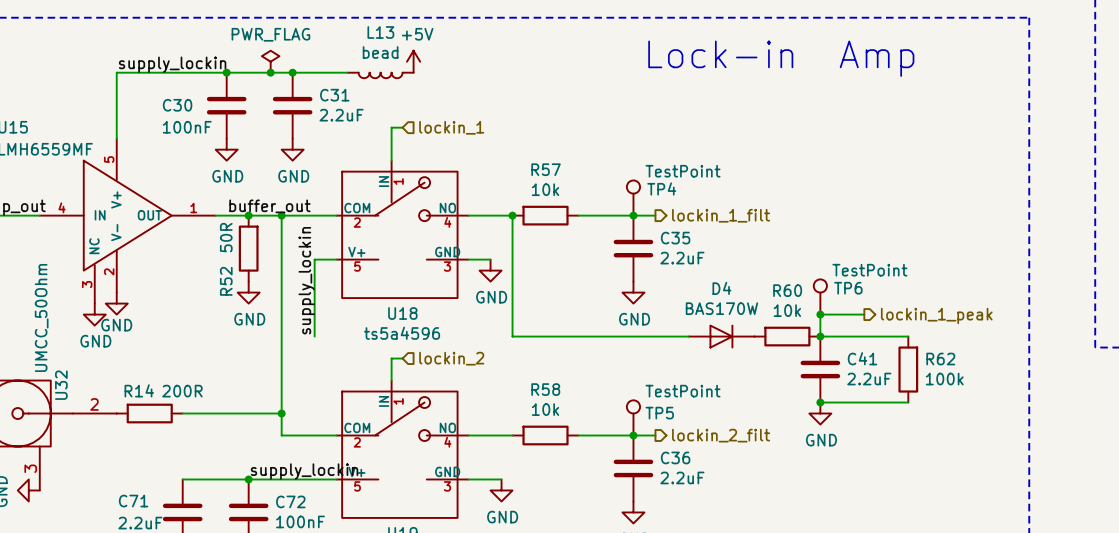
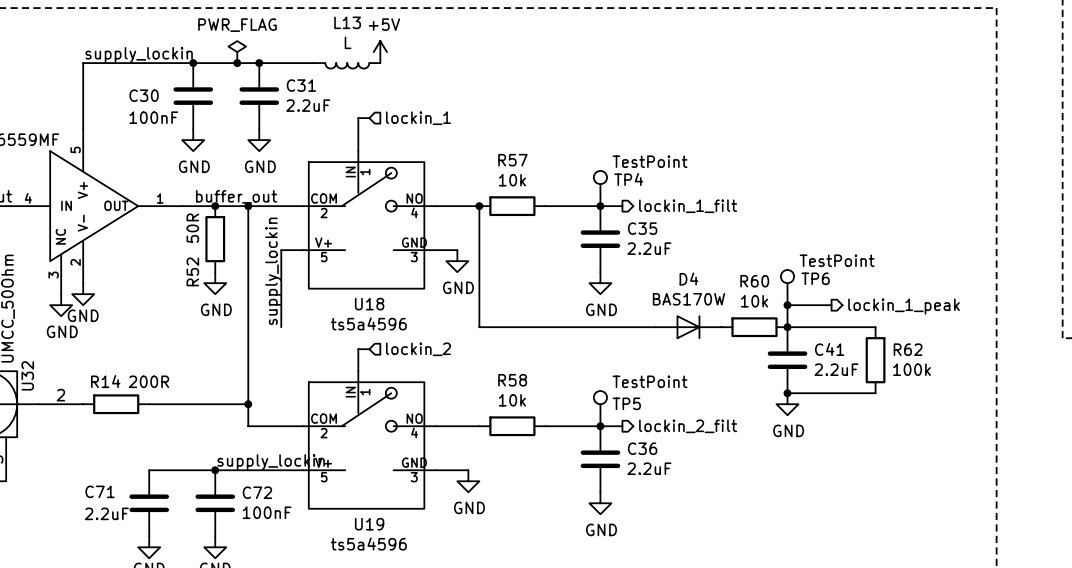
L13 value: bead (380, 52) -> L (348, 42)
text: Lock-in Amp (781, 58) -> none

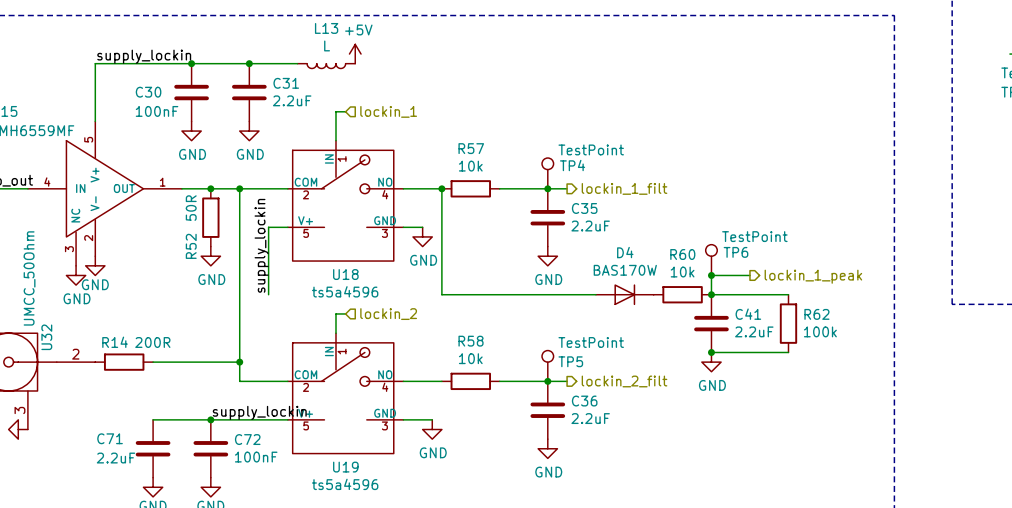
power symbol: PWR_FLAG (237, 52) -> none
junction: (237, 63) -> none
label: buffer_out (236, 196) -> none

